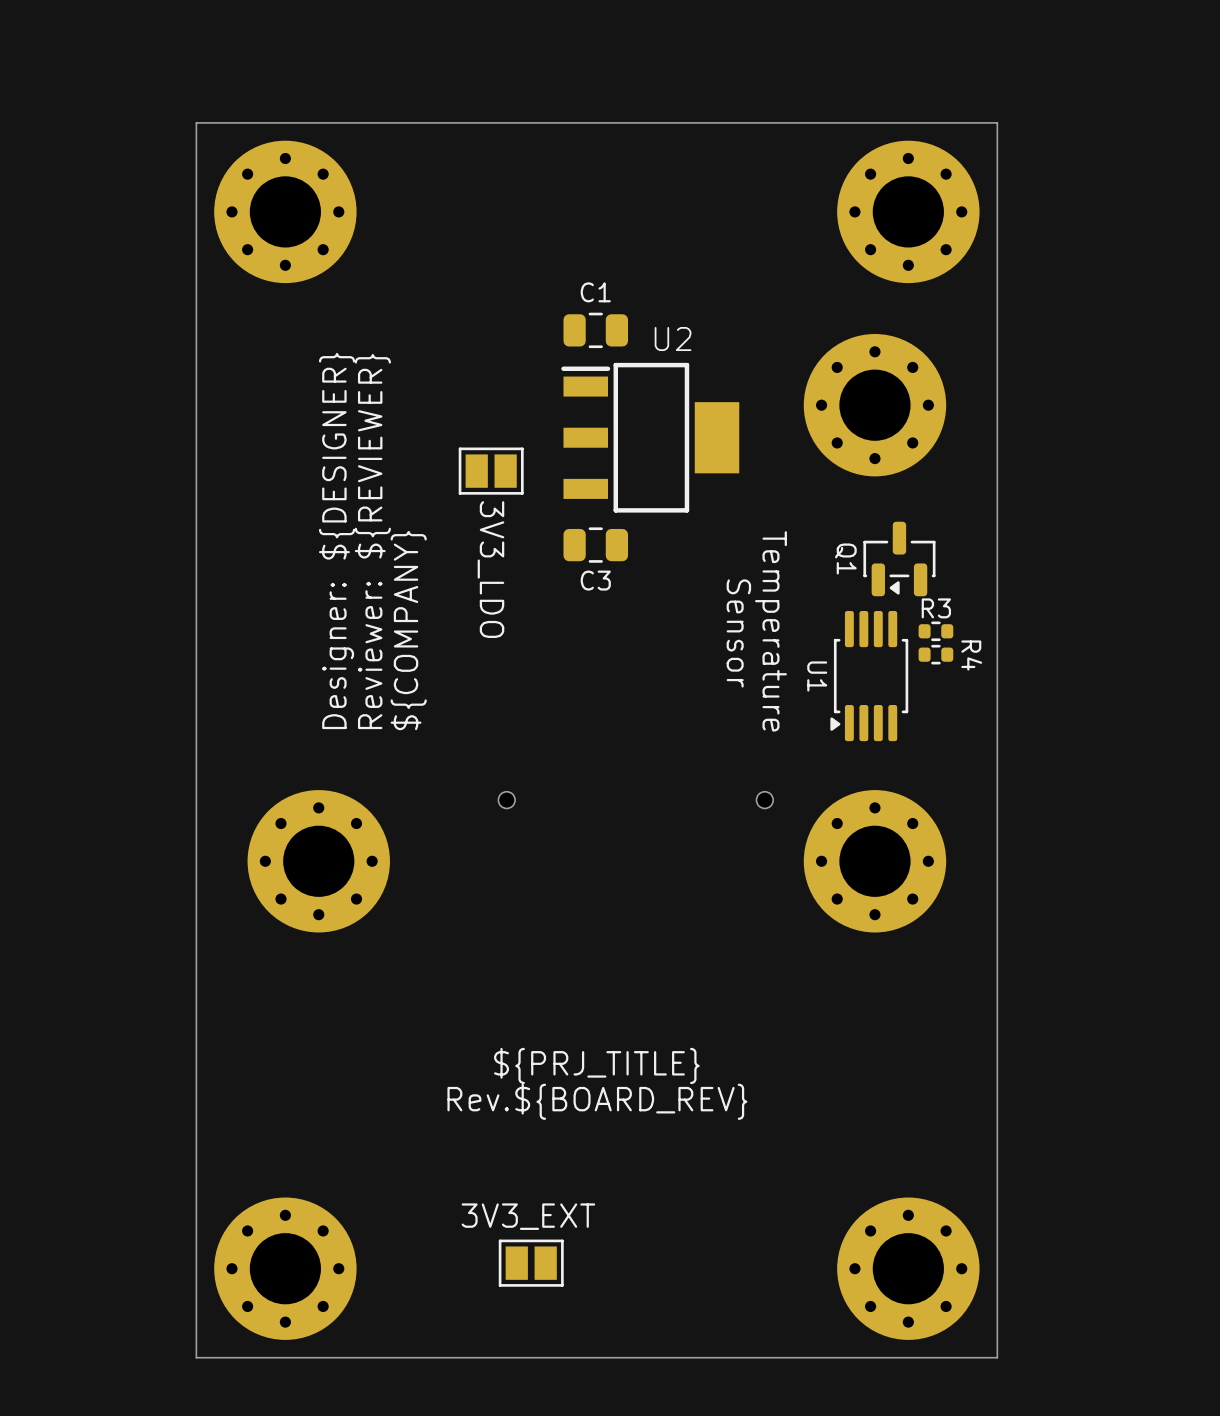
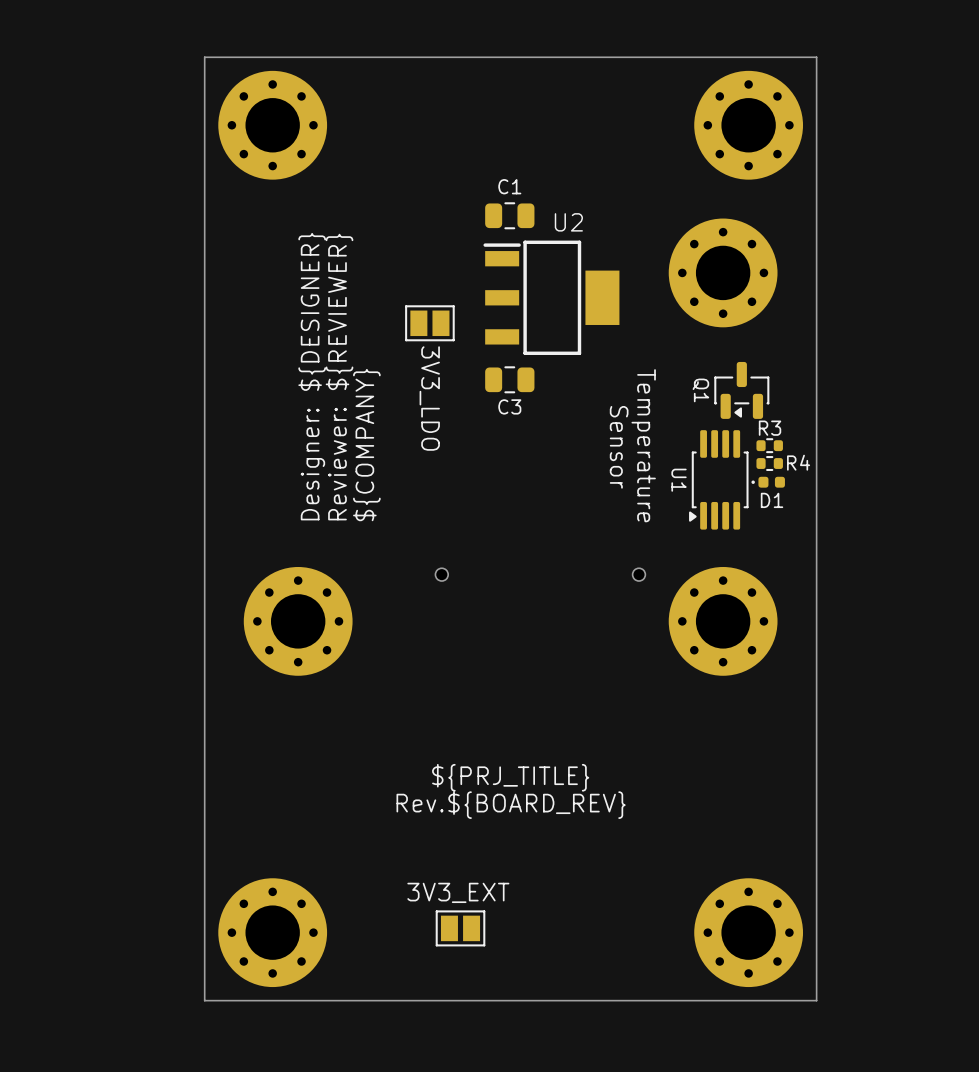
R4 name rotation: 0° (971, 655) -> 90° counterclockwise (798, 462)
D1: none -> (768, 482)

